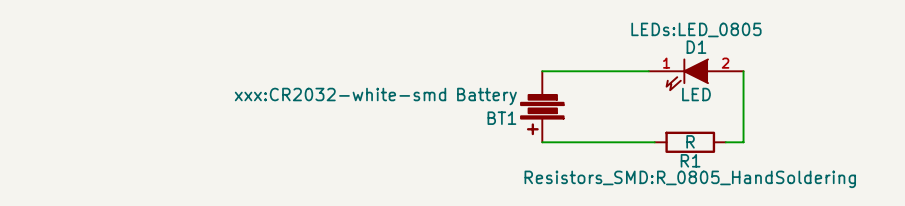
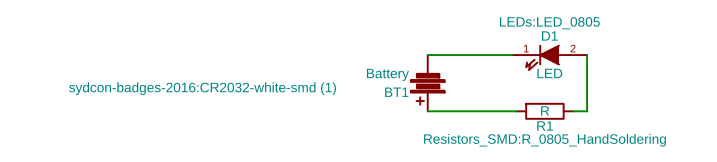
BT1 text: xxx:CR2032-white-smd (340, 94) -> sydcon-badges-2016:CR2032-white-smd (1) (202, 88)

